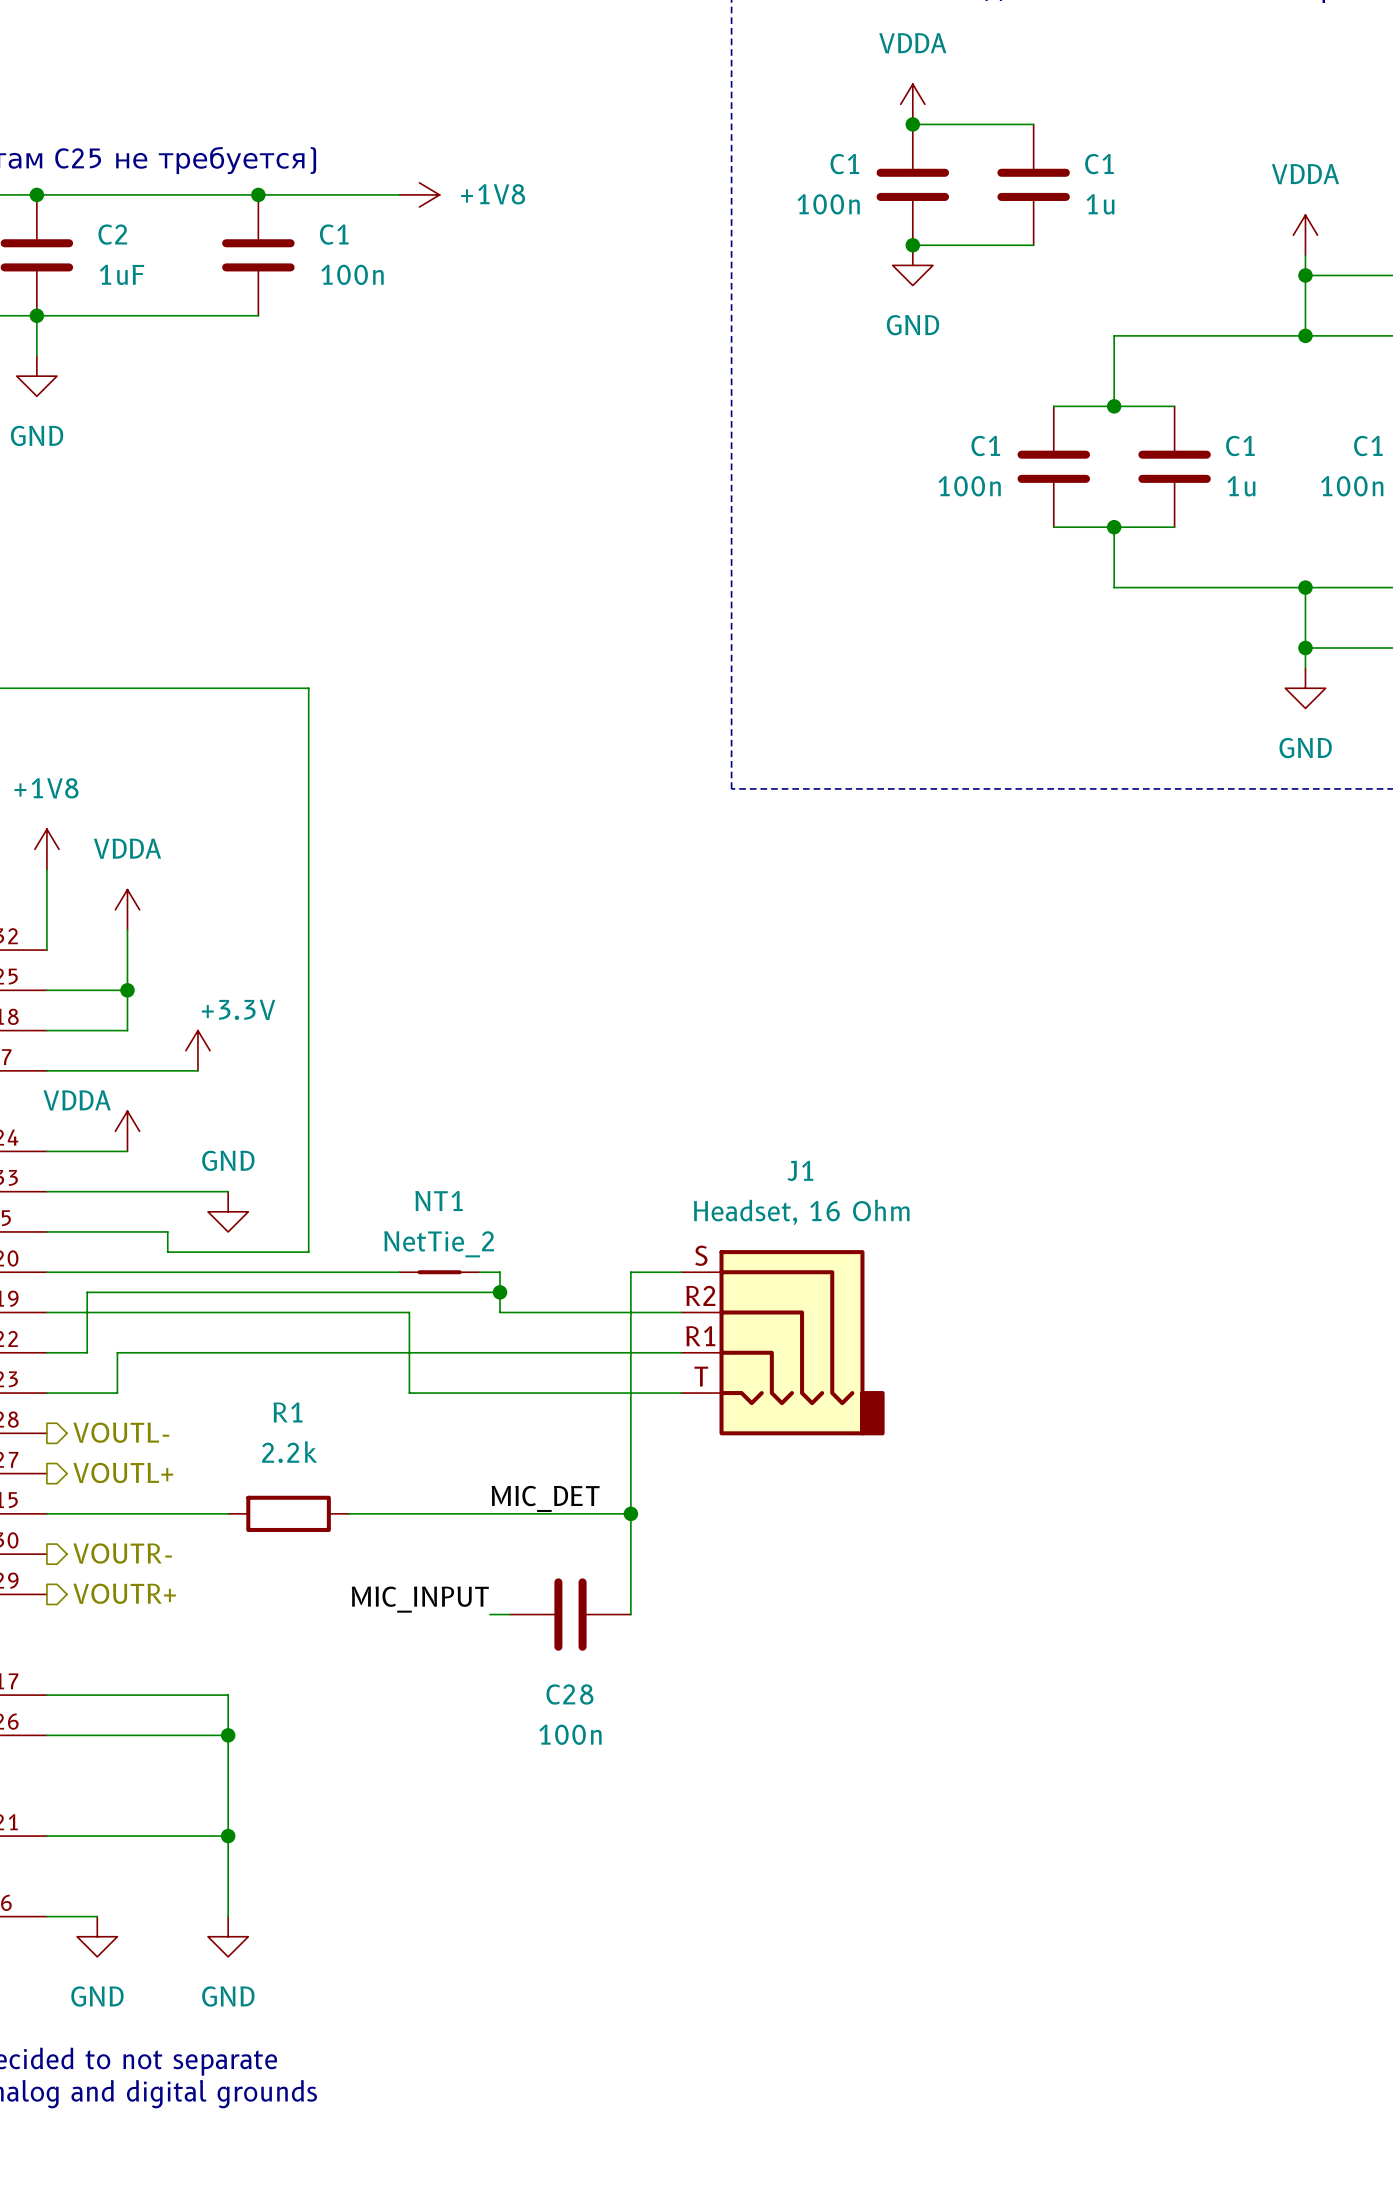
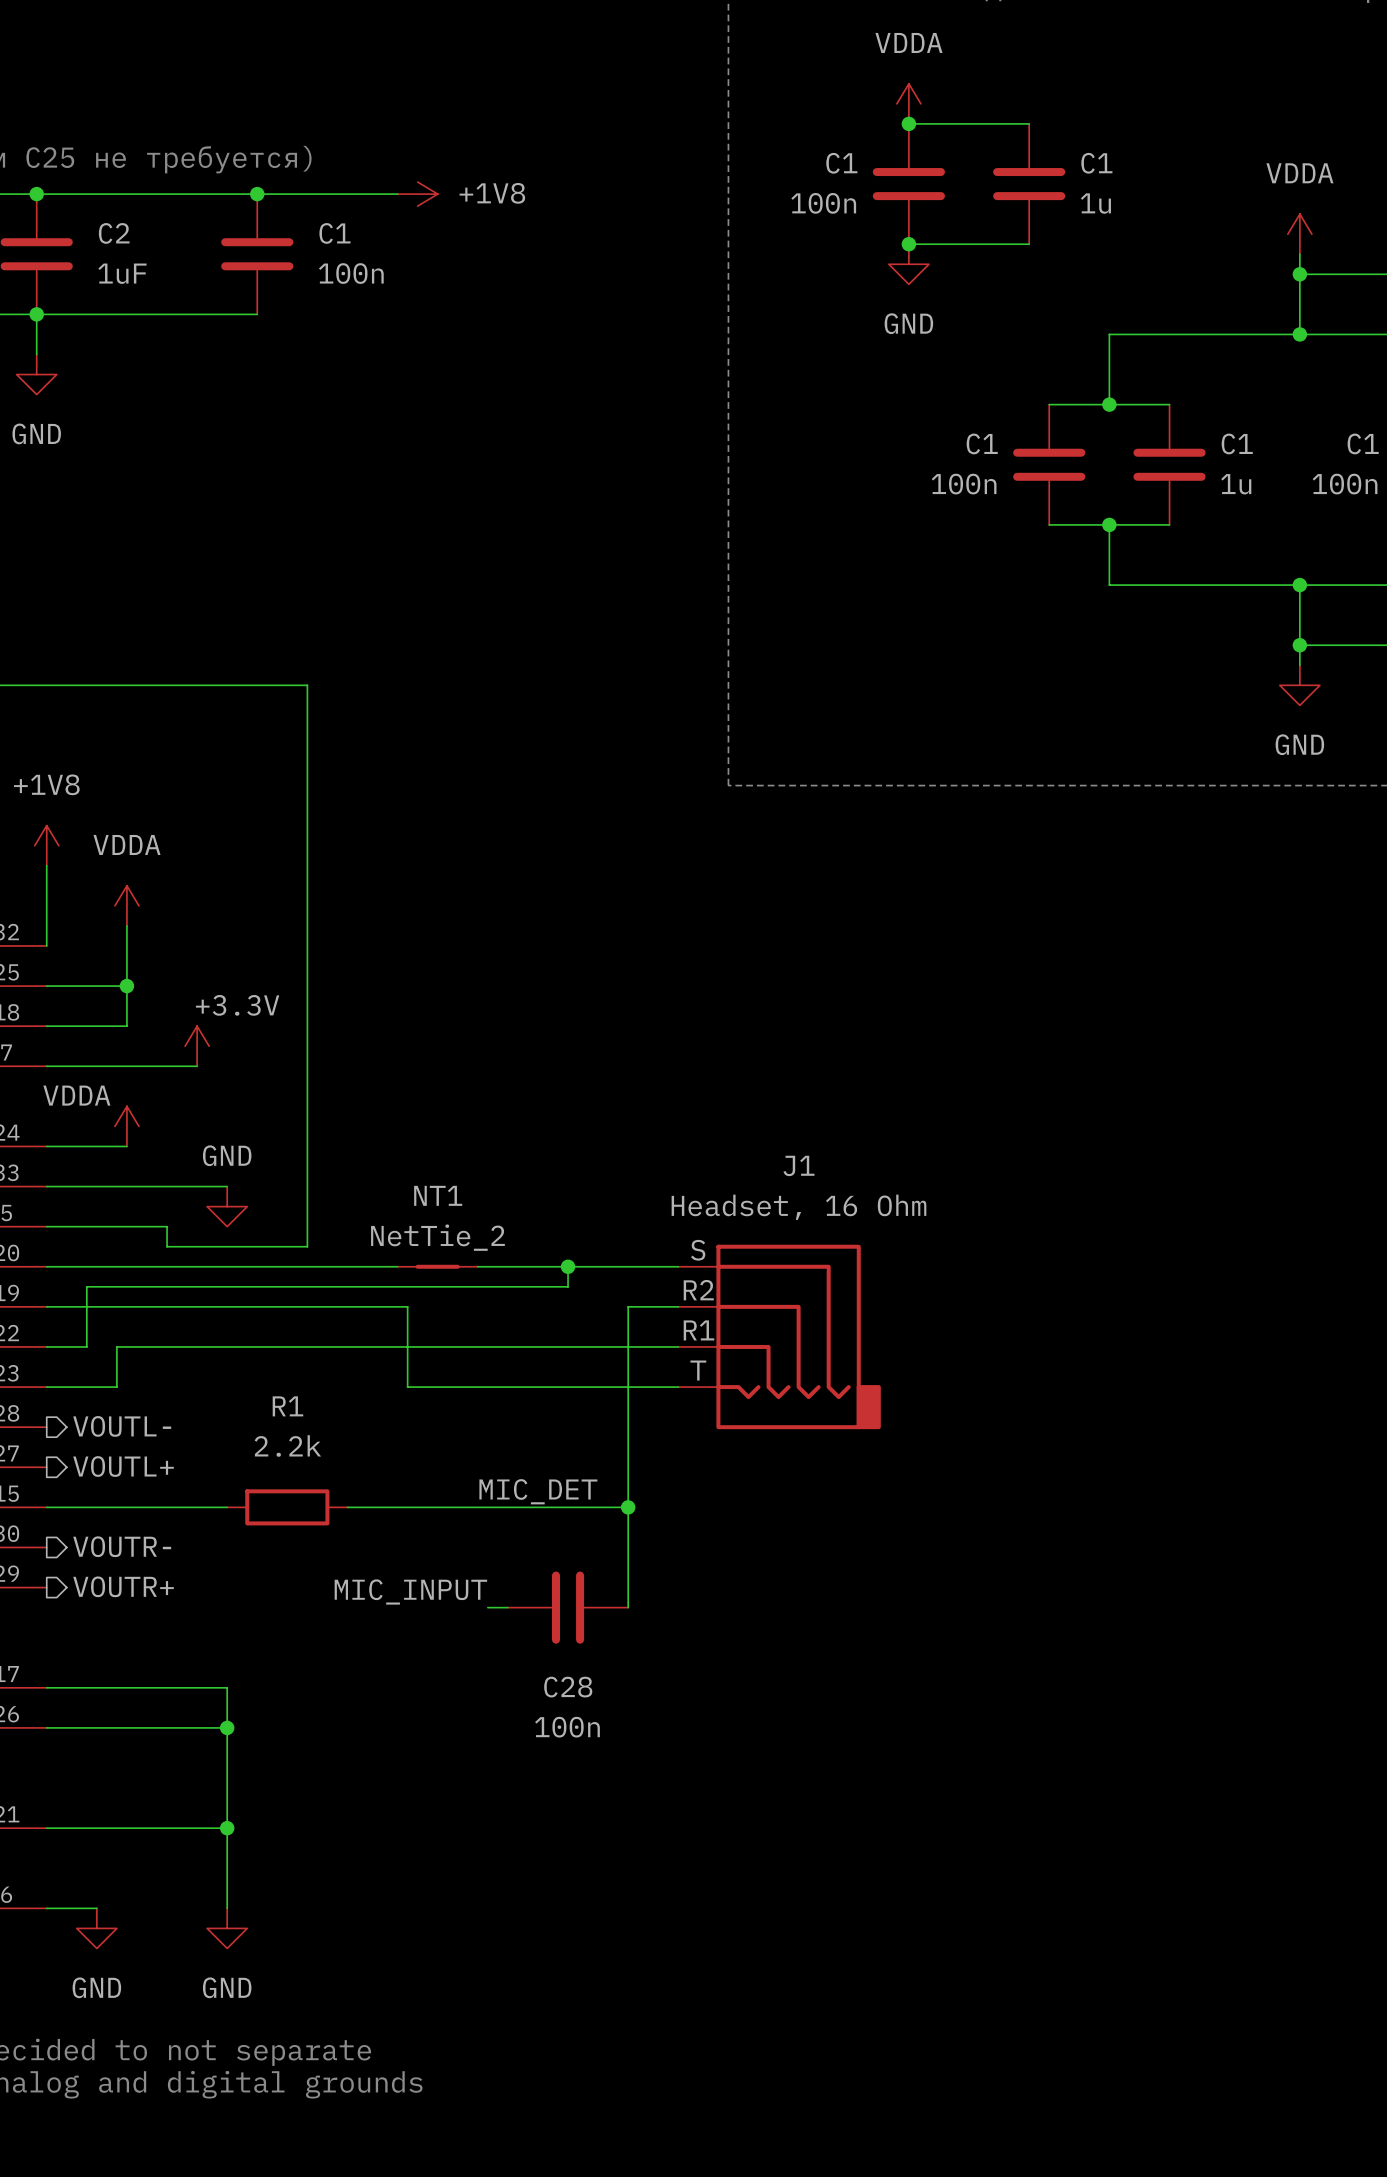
wire: (500, 1272) (500, 1312) (630, 1312) (630, 1272) -> (497, 1266) (628, 1266)
wire: none -> (568, 1266) (568, 1286) (497, 1286)
junction position: (500, 1292) -> (568, 1266)

